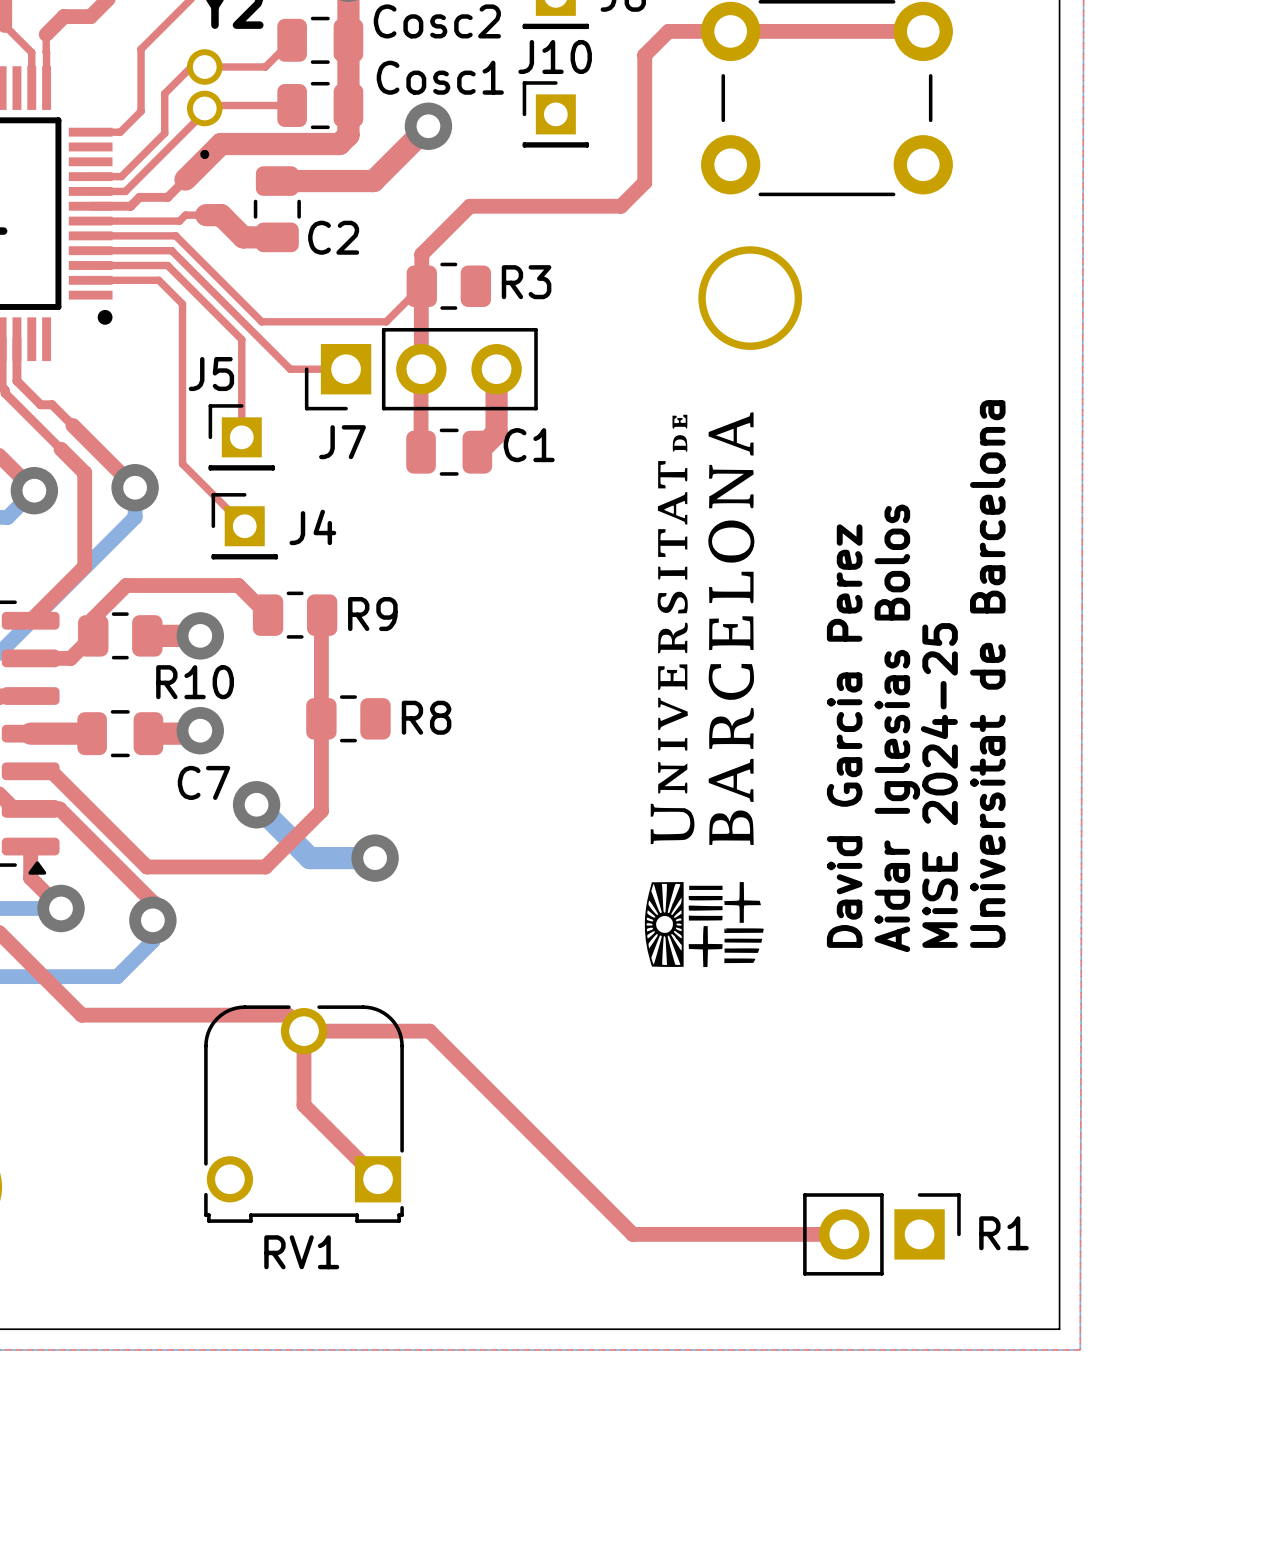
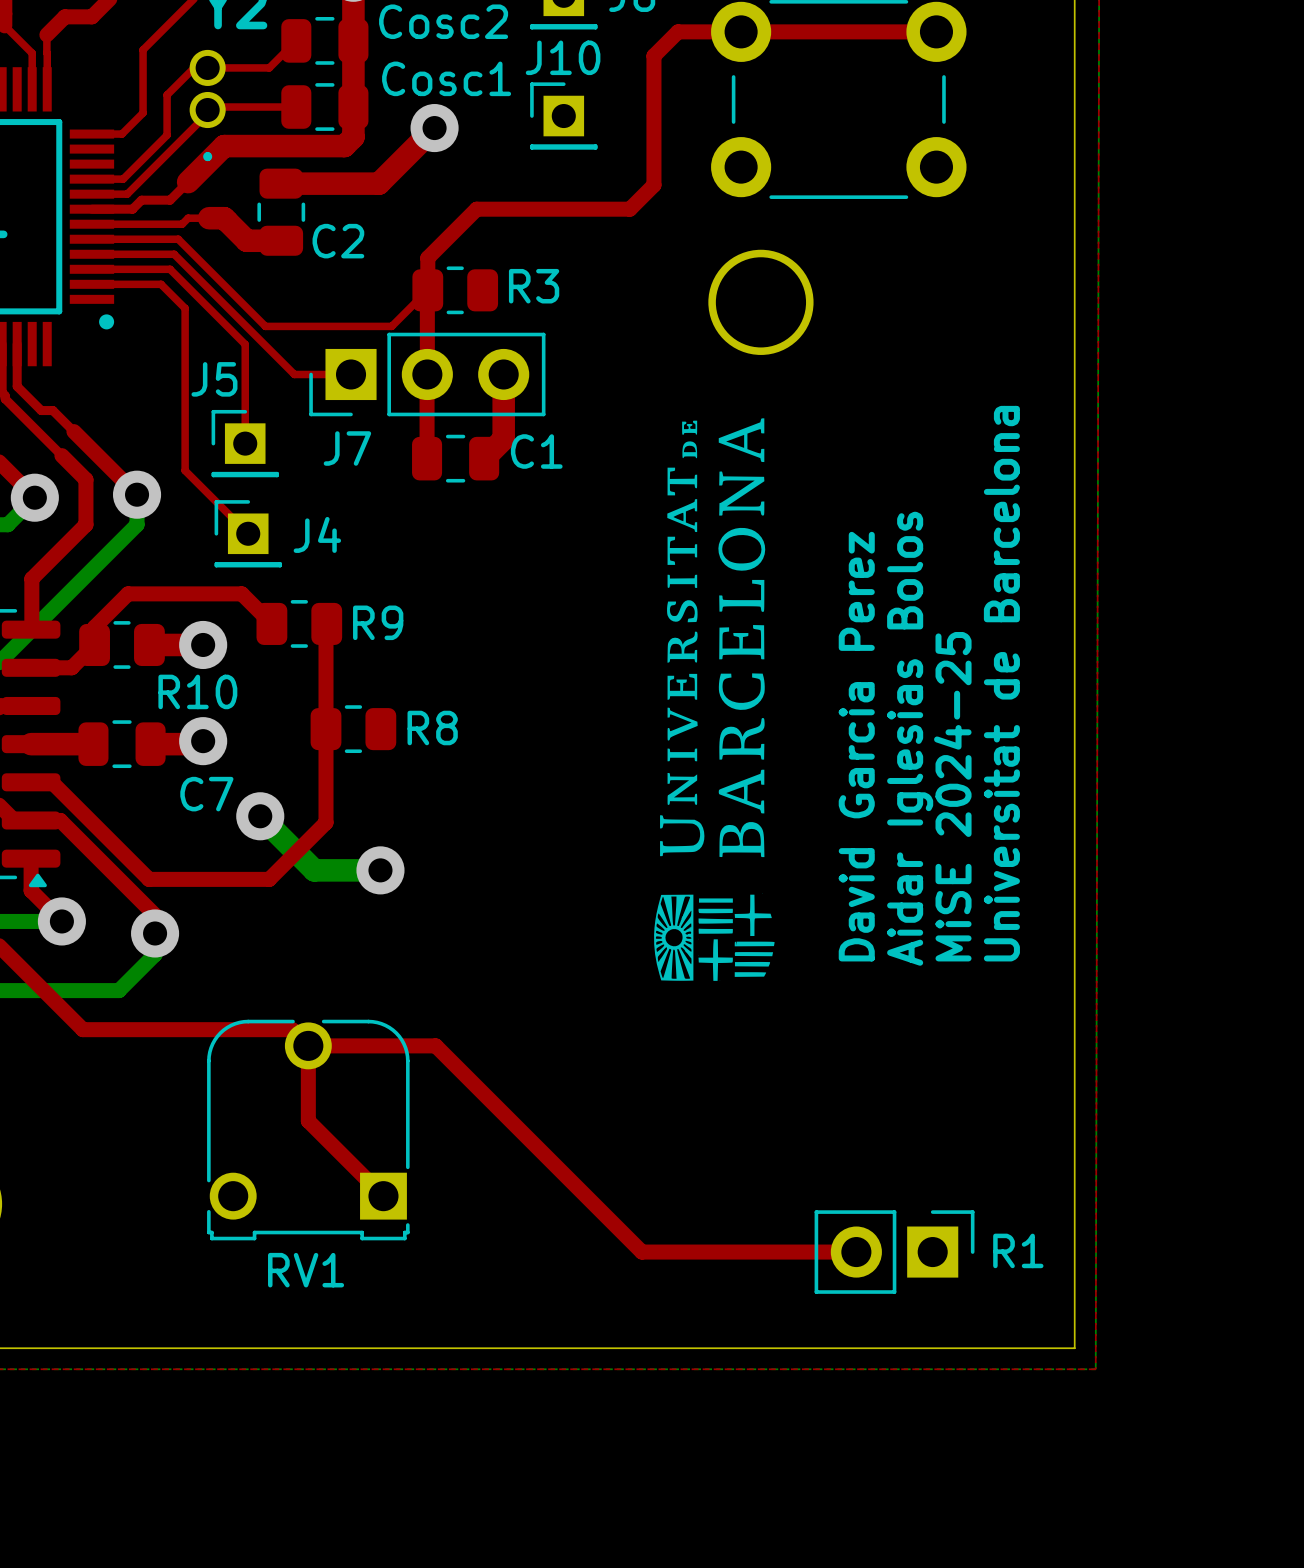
top track: (84, 517) (84, 566) (31, 620) -> (85, 524) (31, 578) (31, 628)

